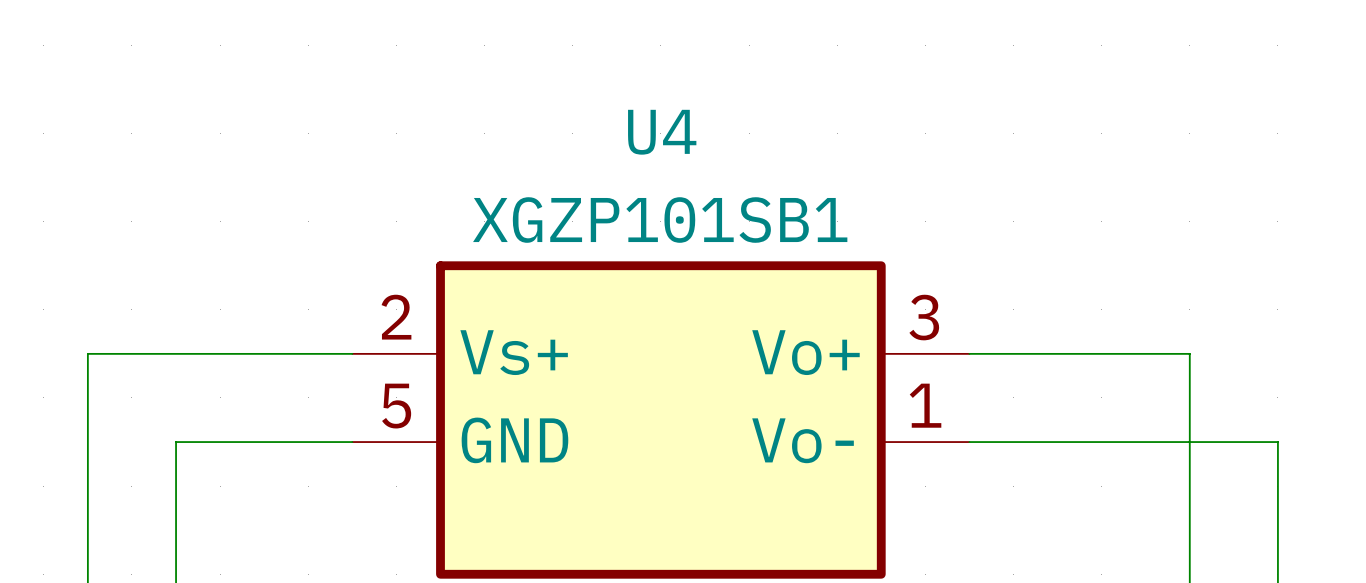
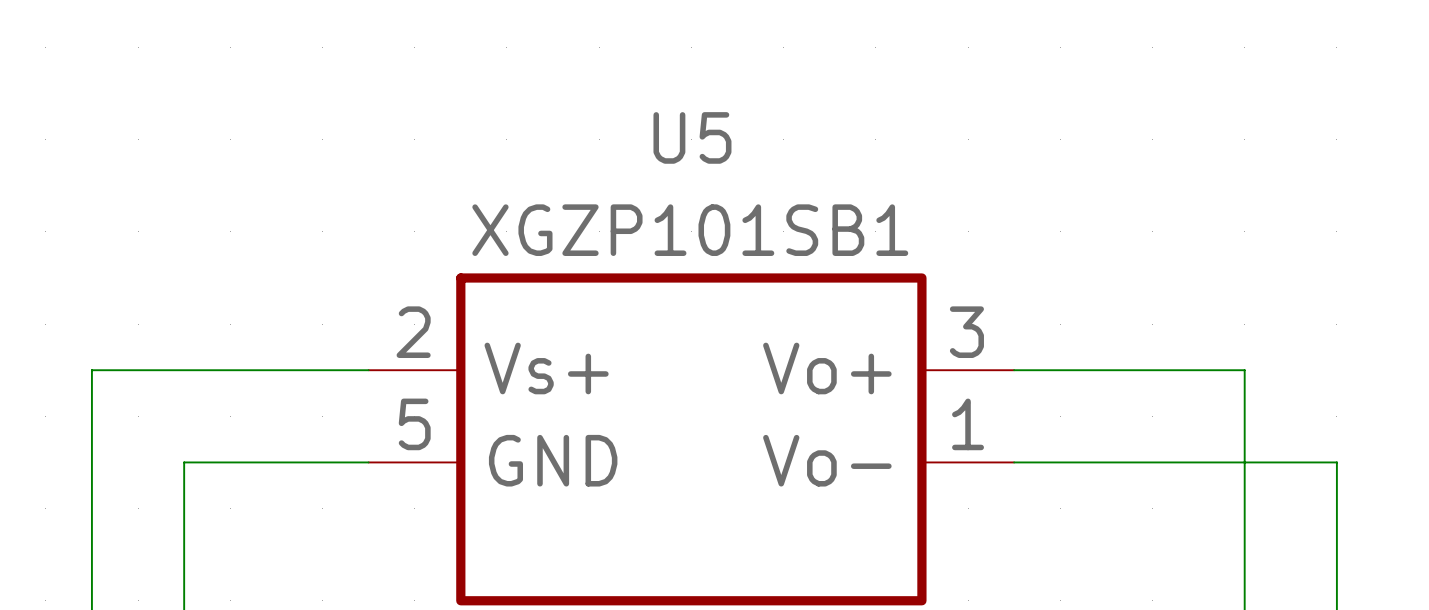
U4 name: U4 (662, 132) -> U5 (692, 137)

